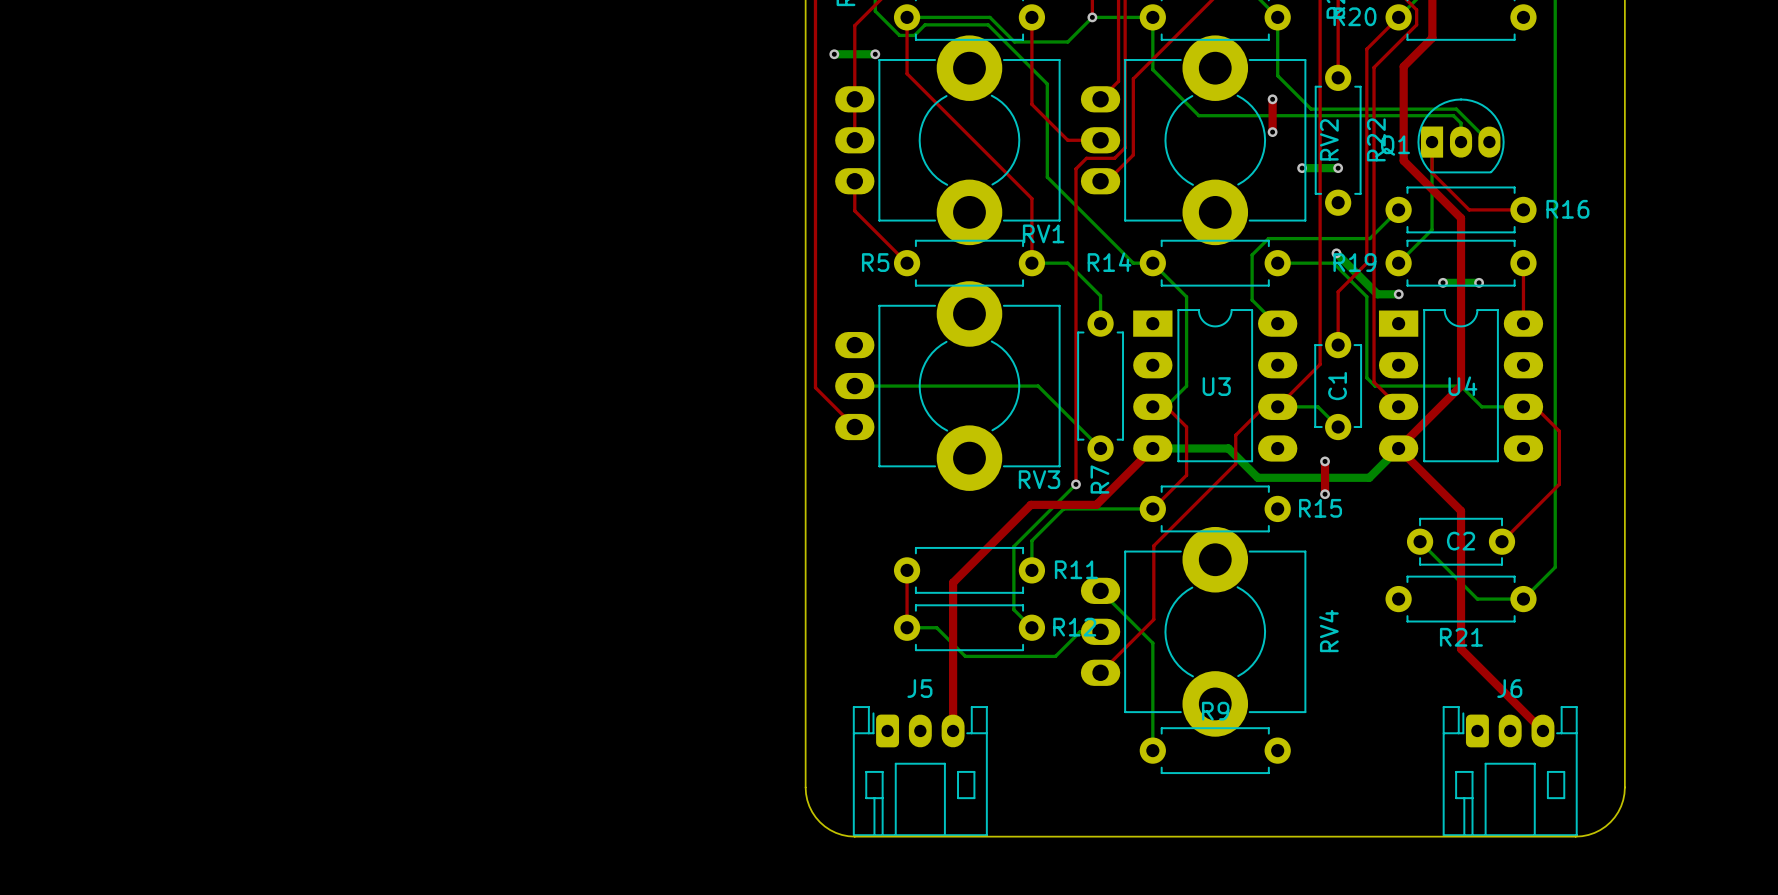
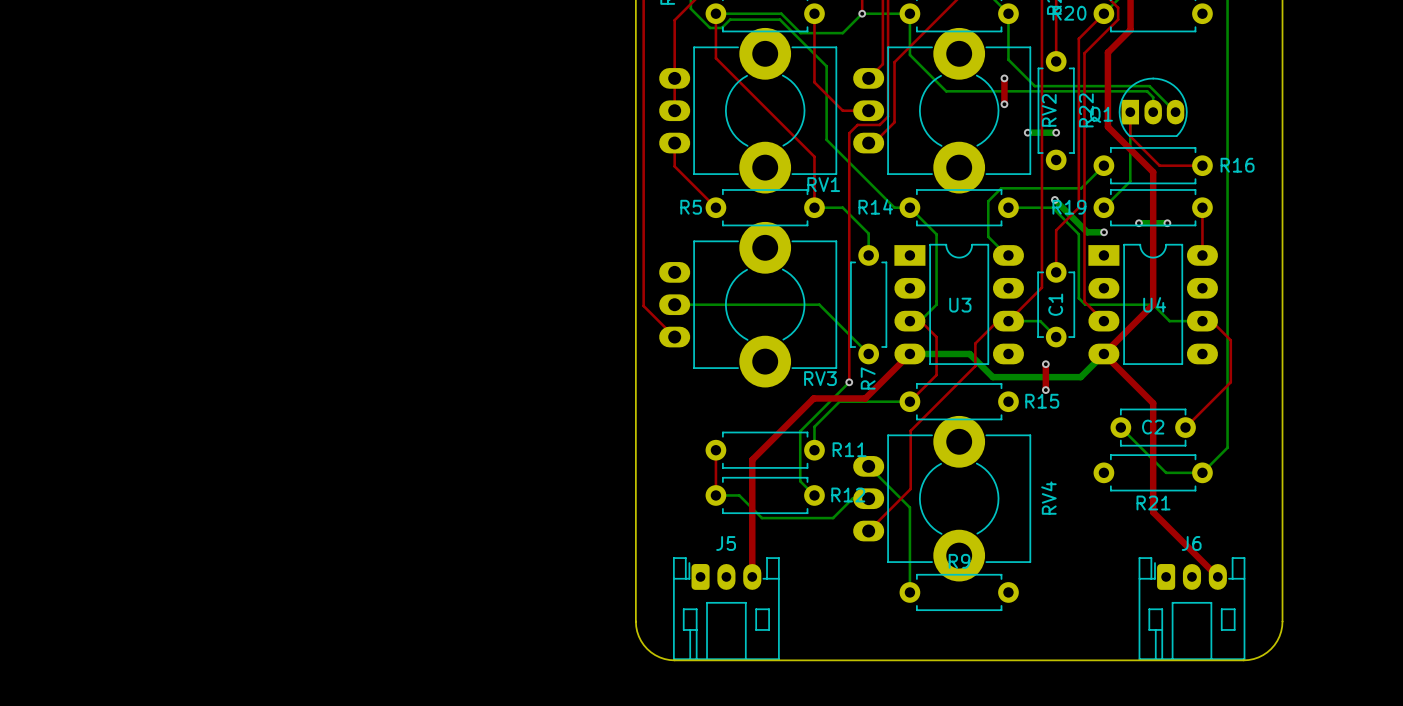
bottom track: (834, 54) (875, 54) -> none
via: (834, 54) -> none
via: (875, 54) -> none

